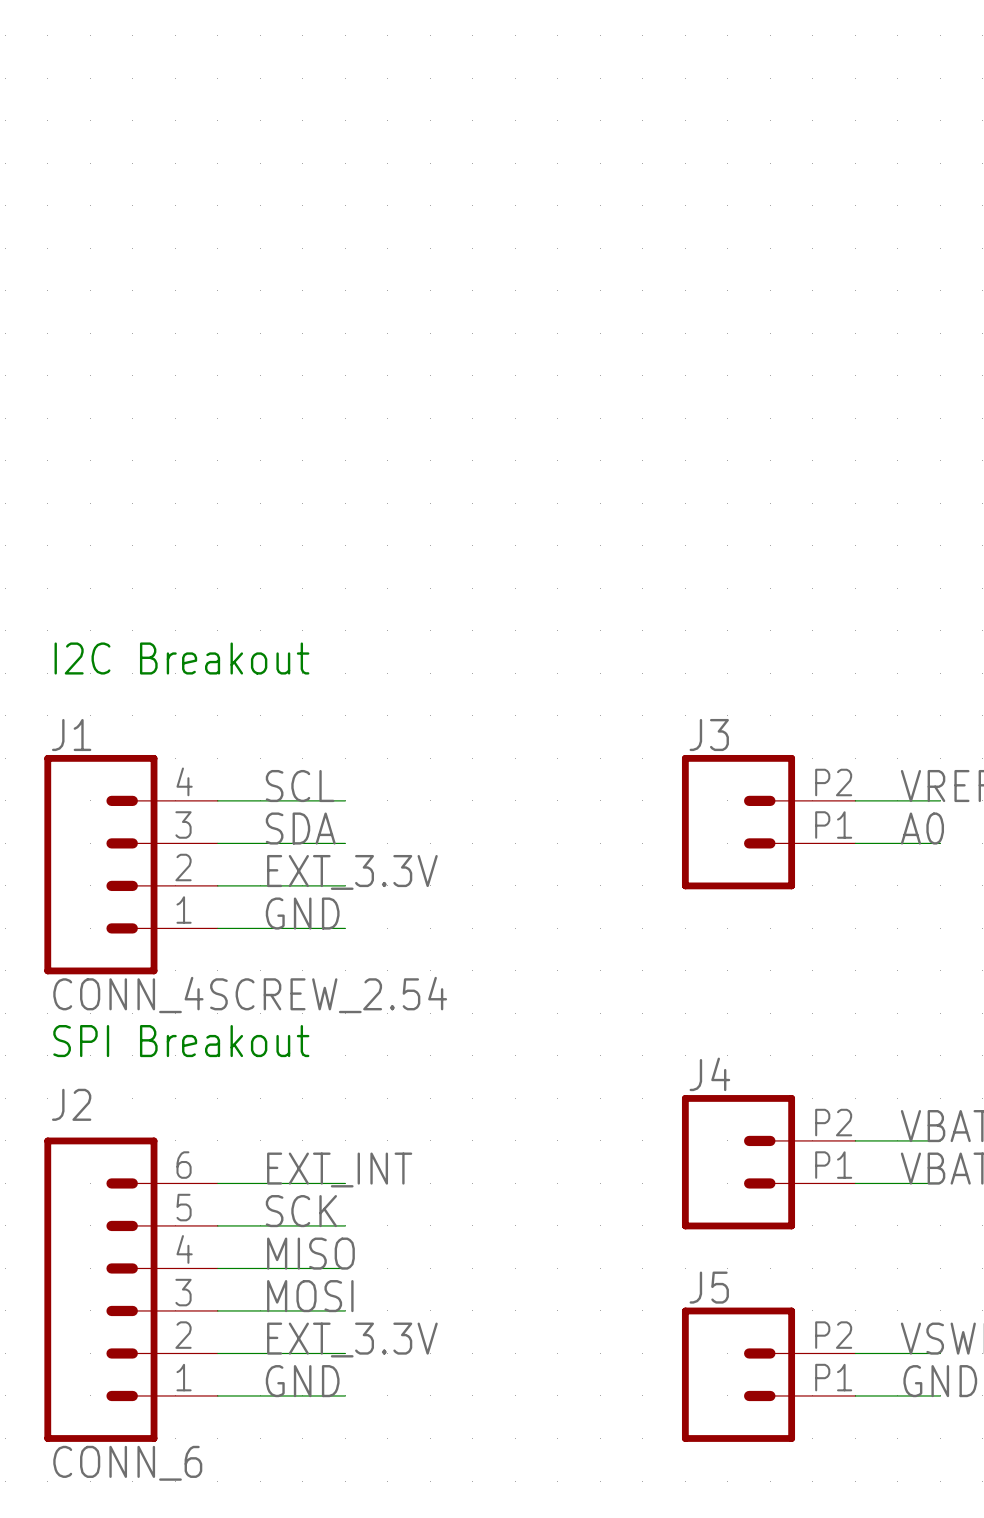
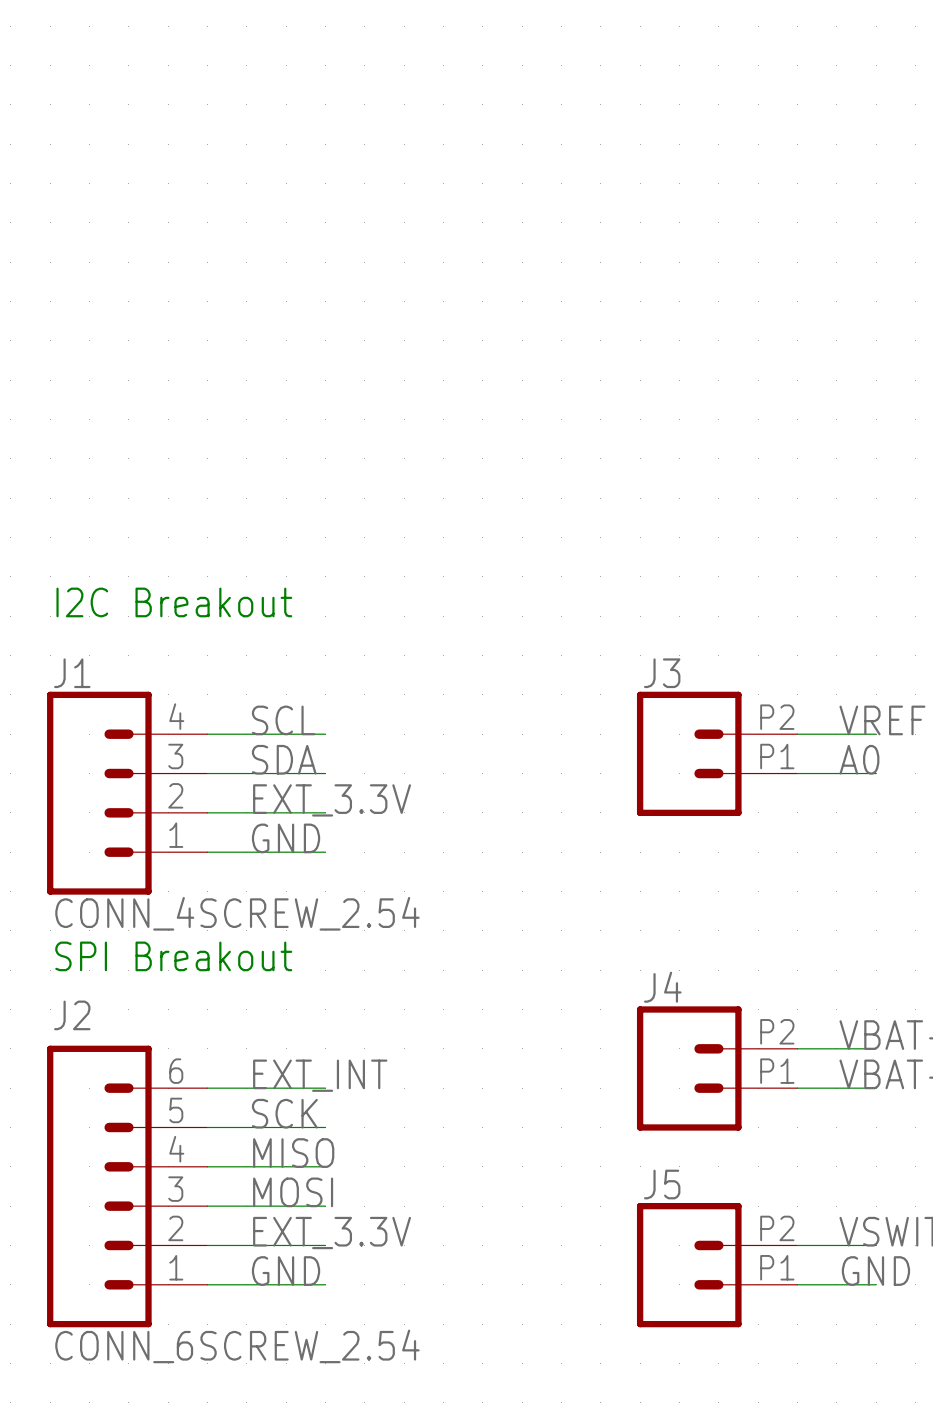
J2 value: CONN_6 (127, 1463) -> CONN_6SCREW_2.54 (237, 1346)

